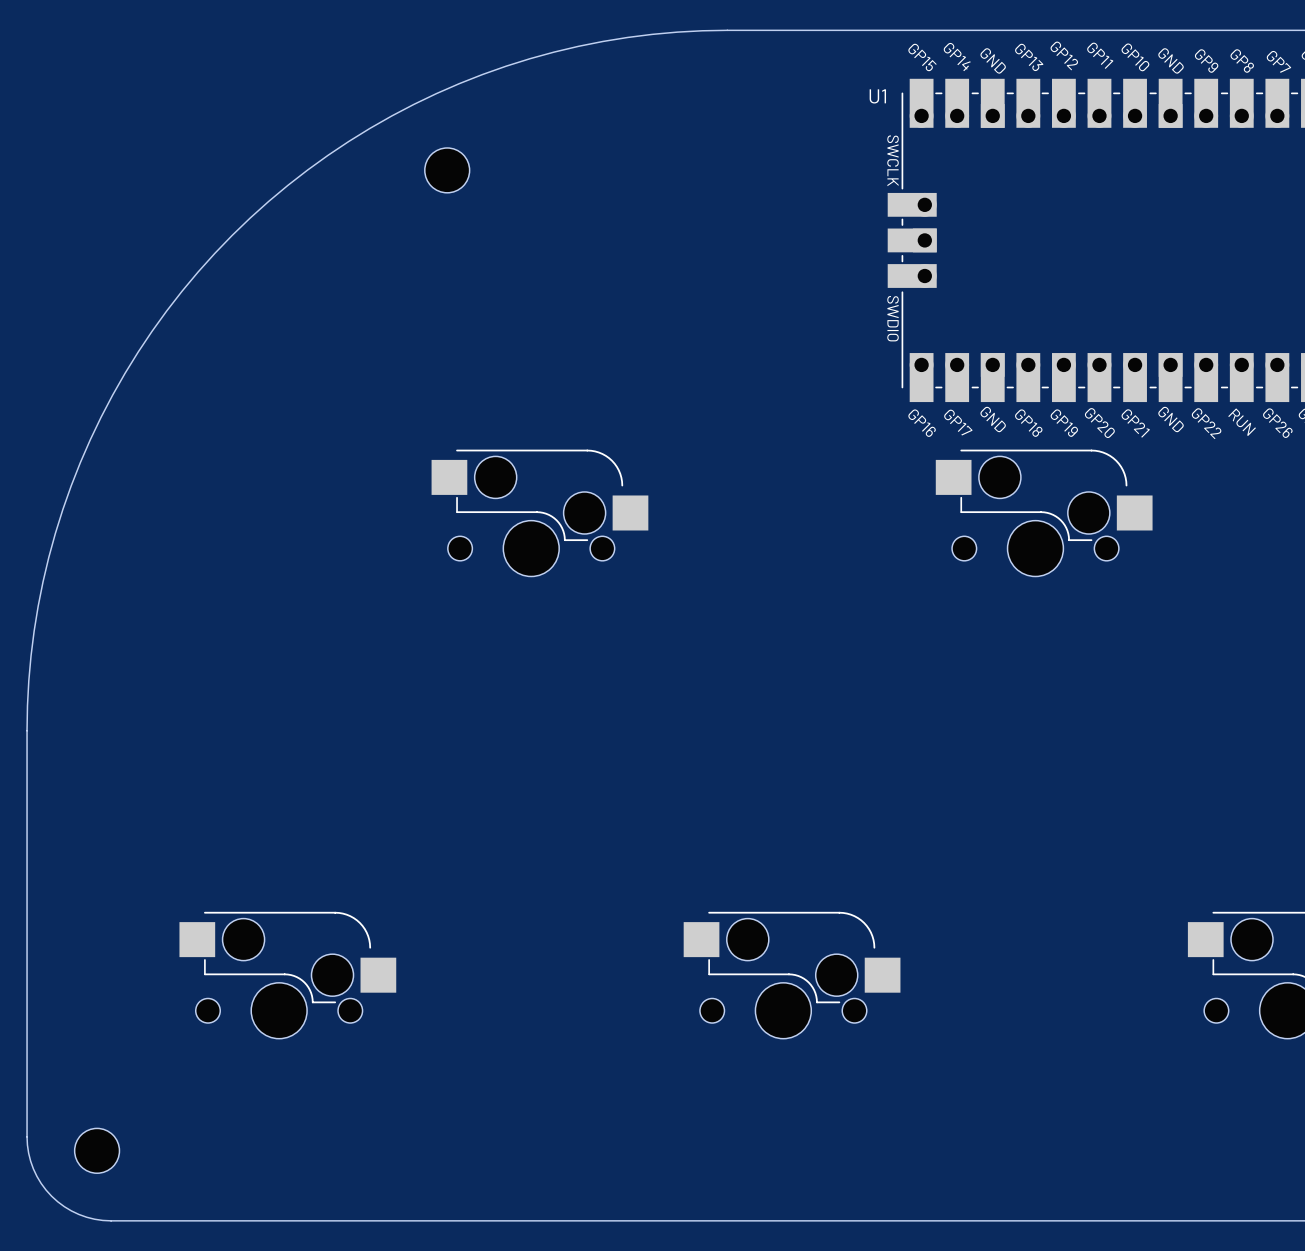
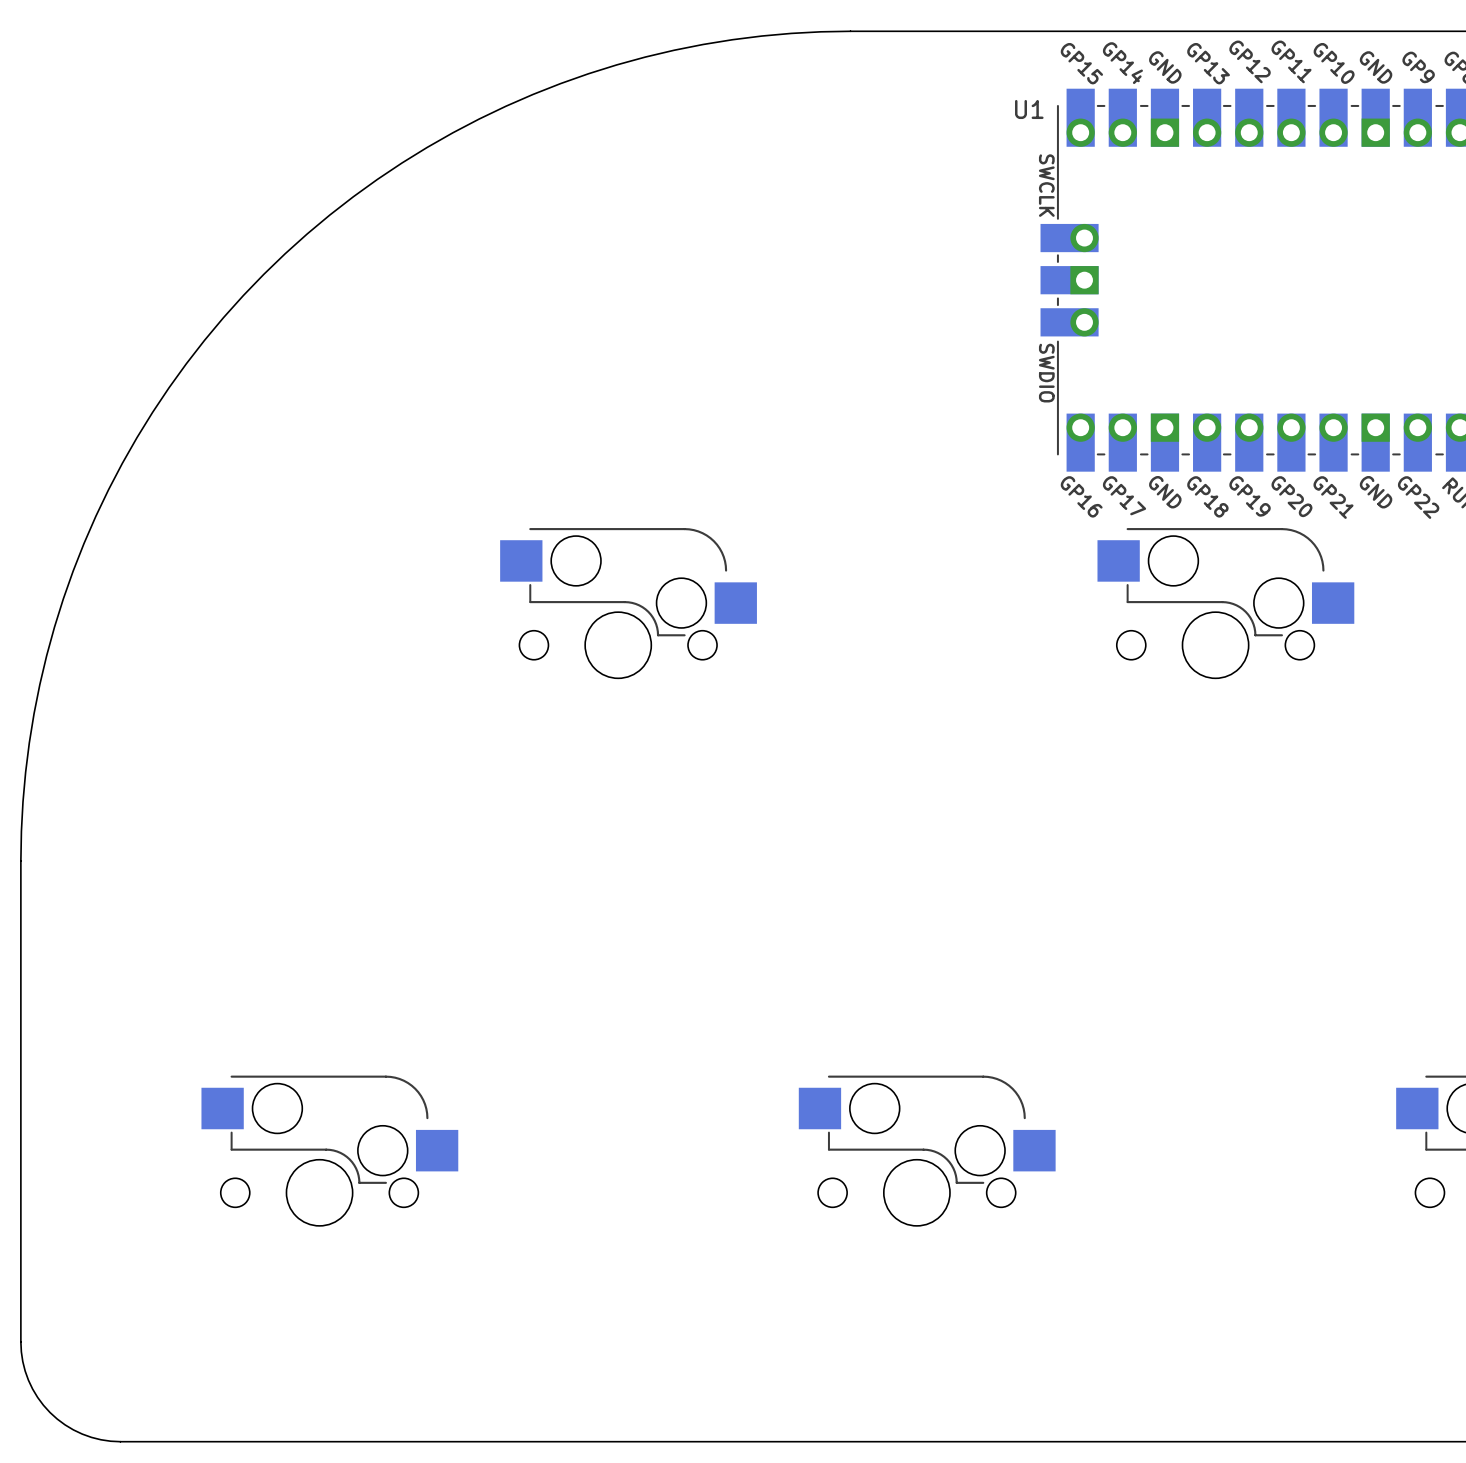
part: (447, 170) -> none
part: (97, 1150) -> none

